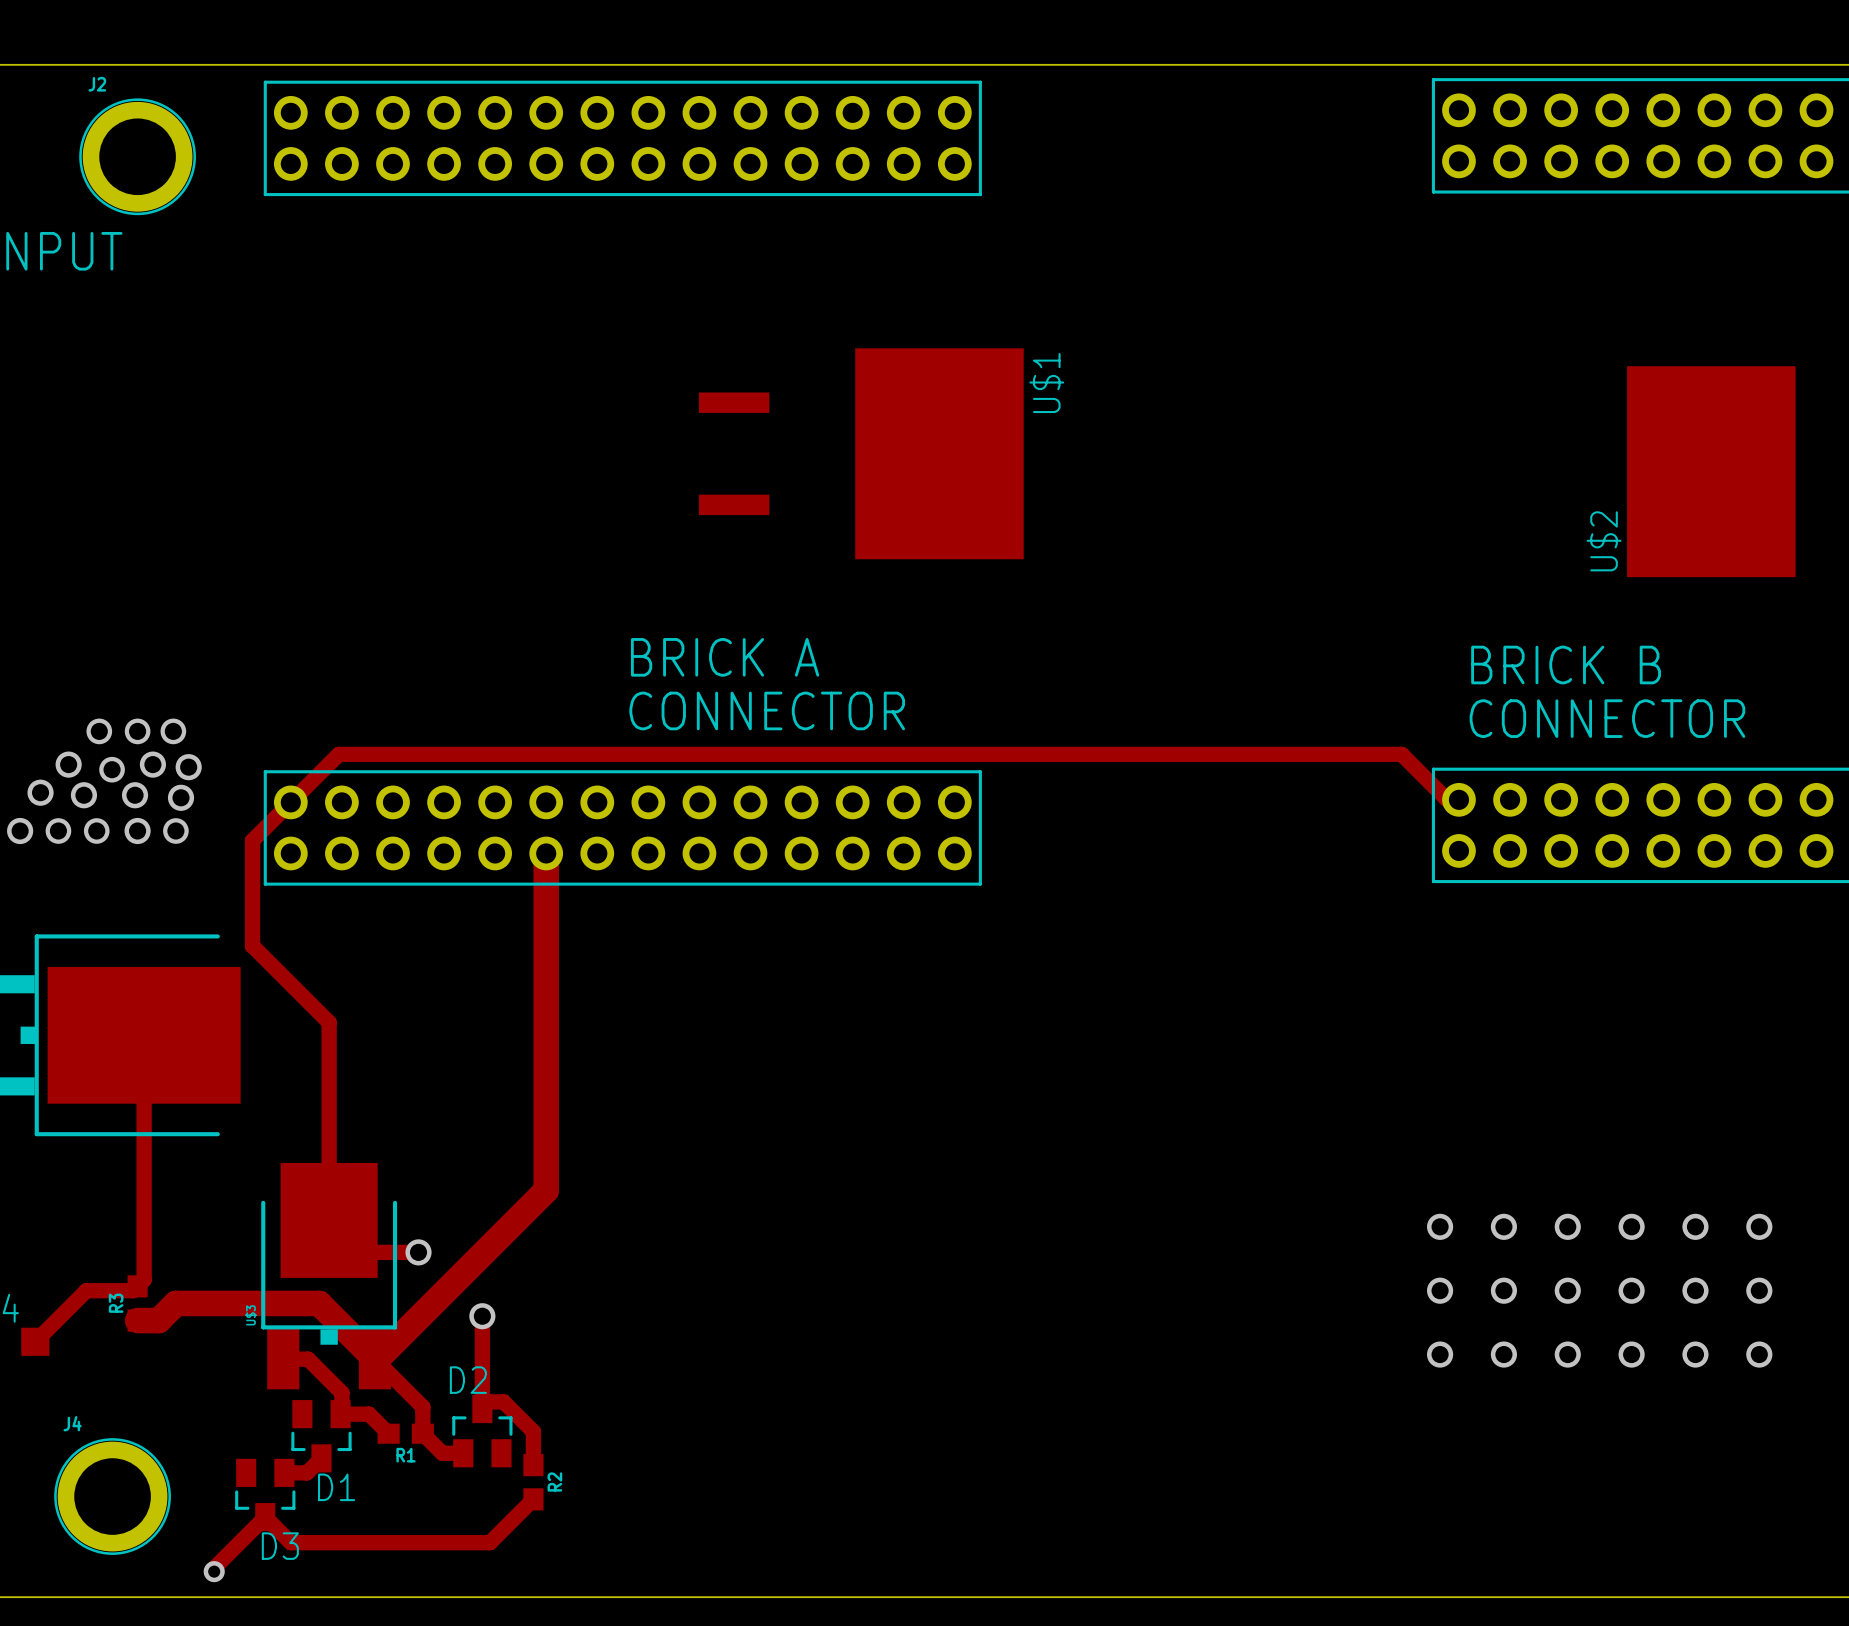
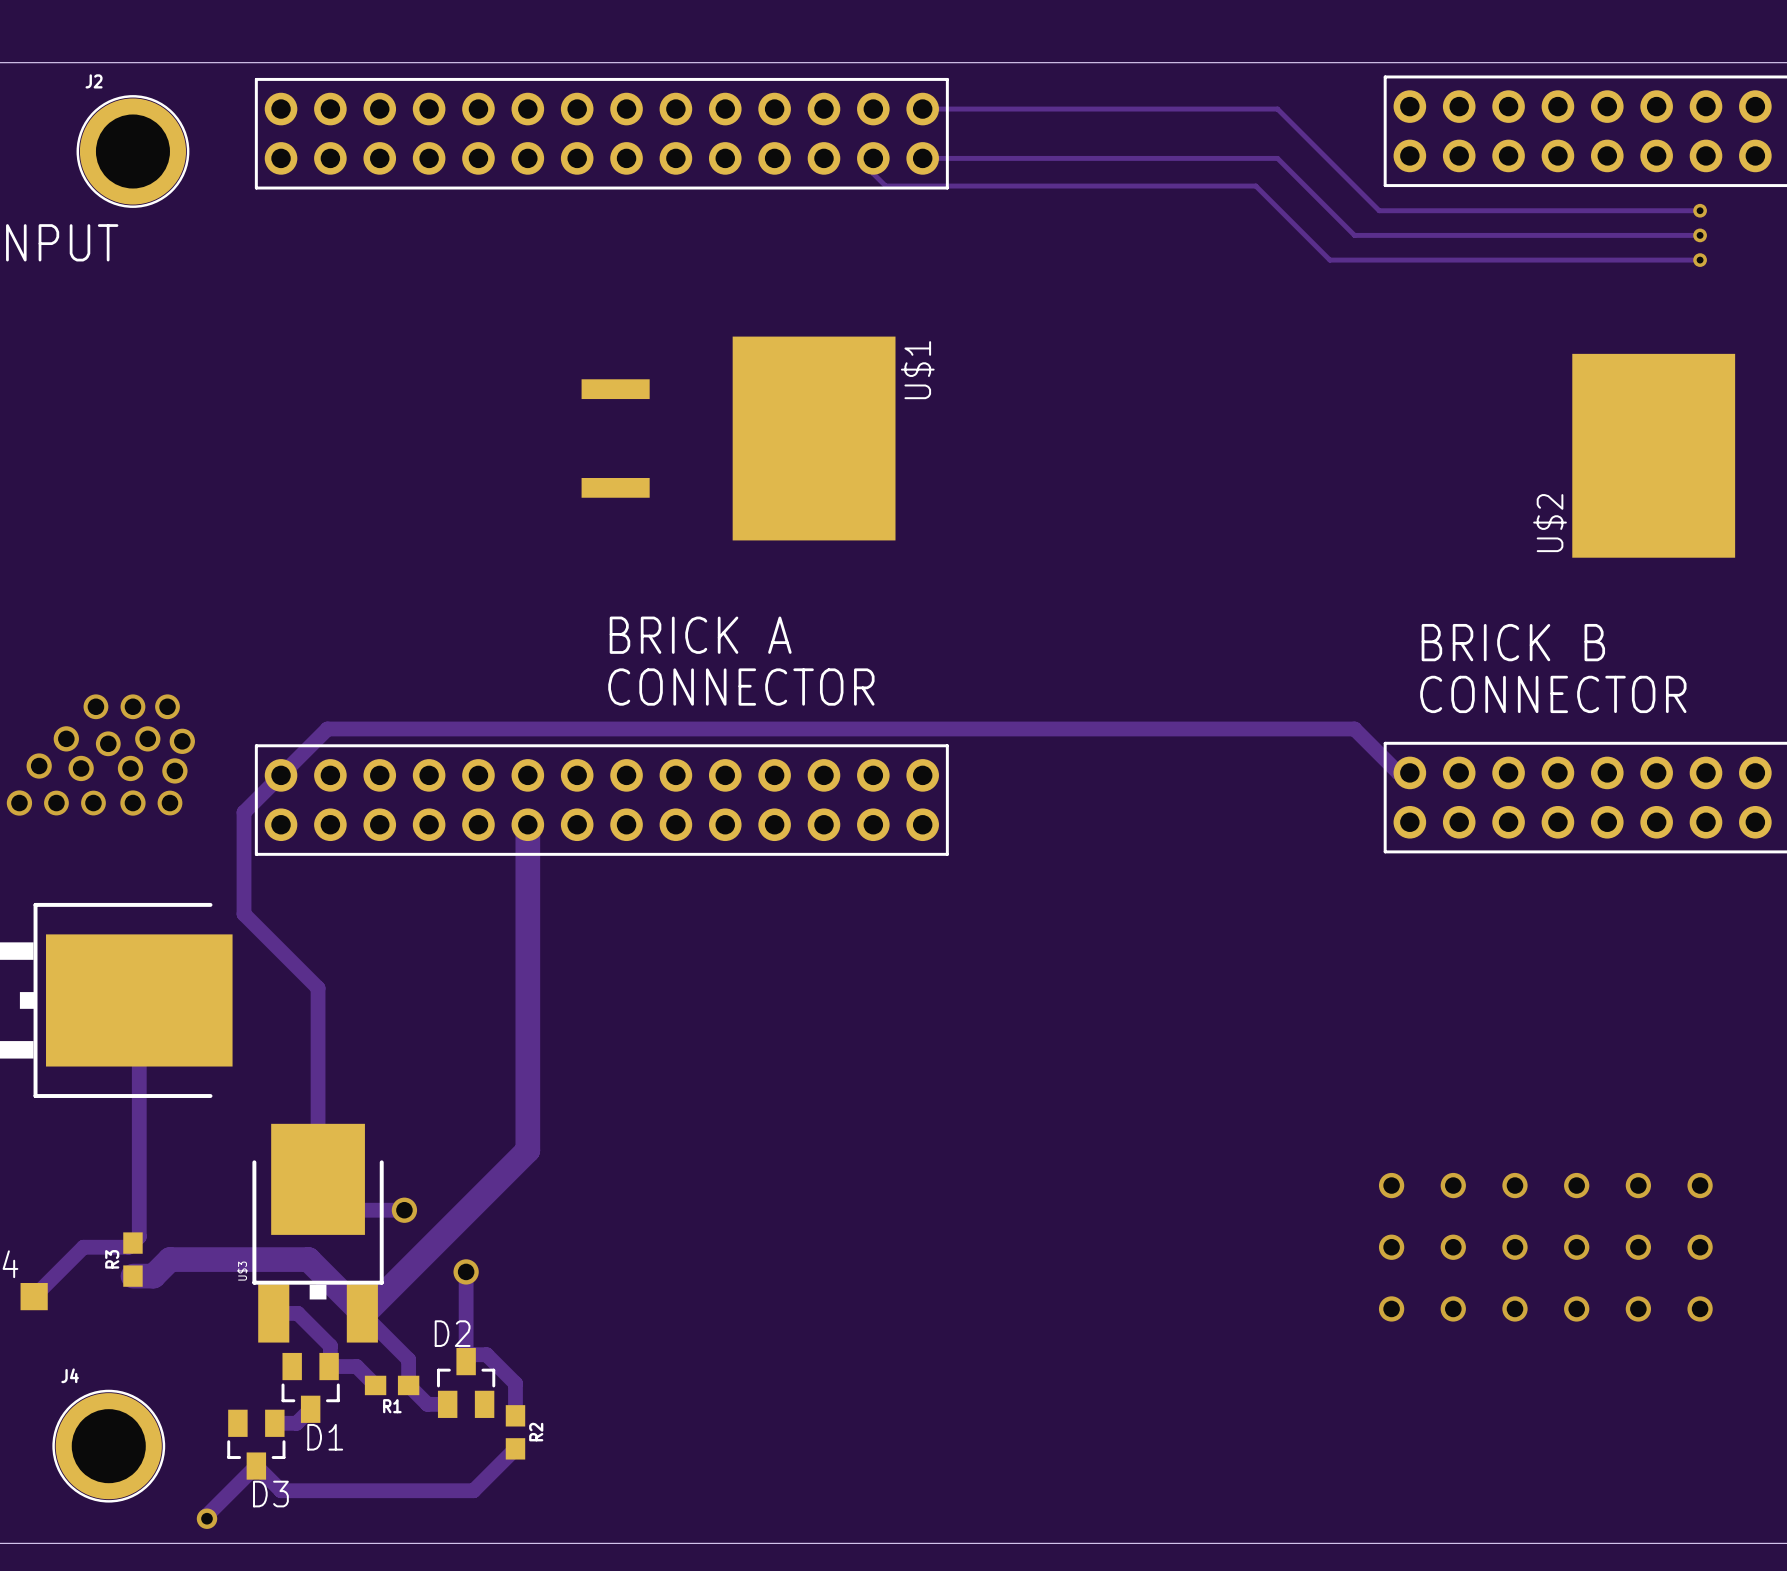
track: none -> (922, 109) (1277, 109) (1379, 210) (1700, 210)
track: none -> (873, 158) (873, 173) (885, 186) (1255, 186) (1329, 260) (1700, 260)
track: none -> (922, 158) (1277, 158) (1354, 235) (1700, 235)
via: none -> (1700, 210)
via: none -> (1700, 235)
via: none -> (1700, 260)
U$1 position: (861, 453) -> (738, 438)

